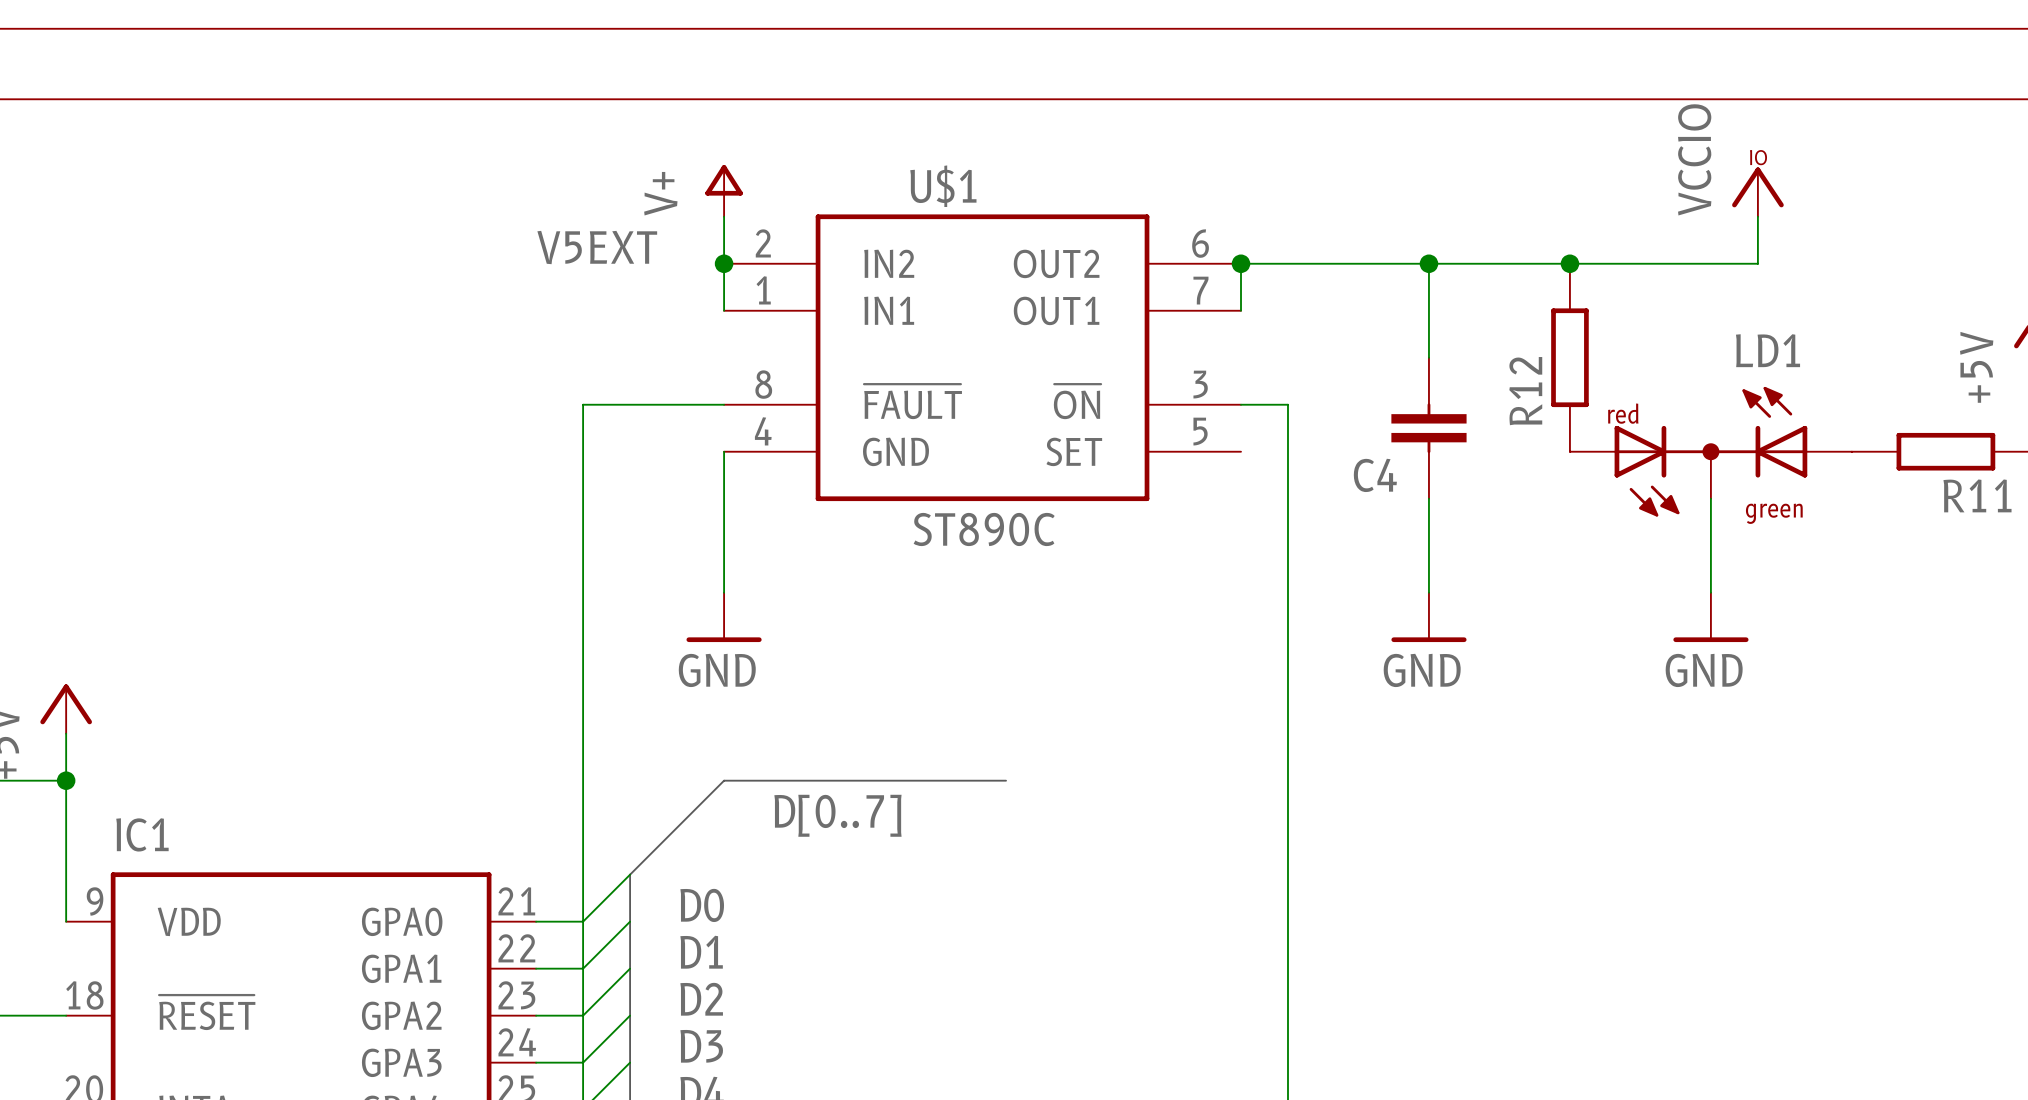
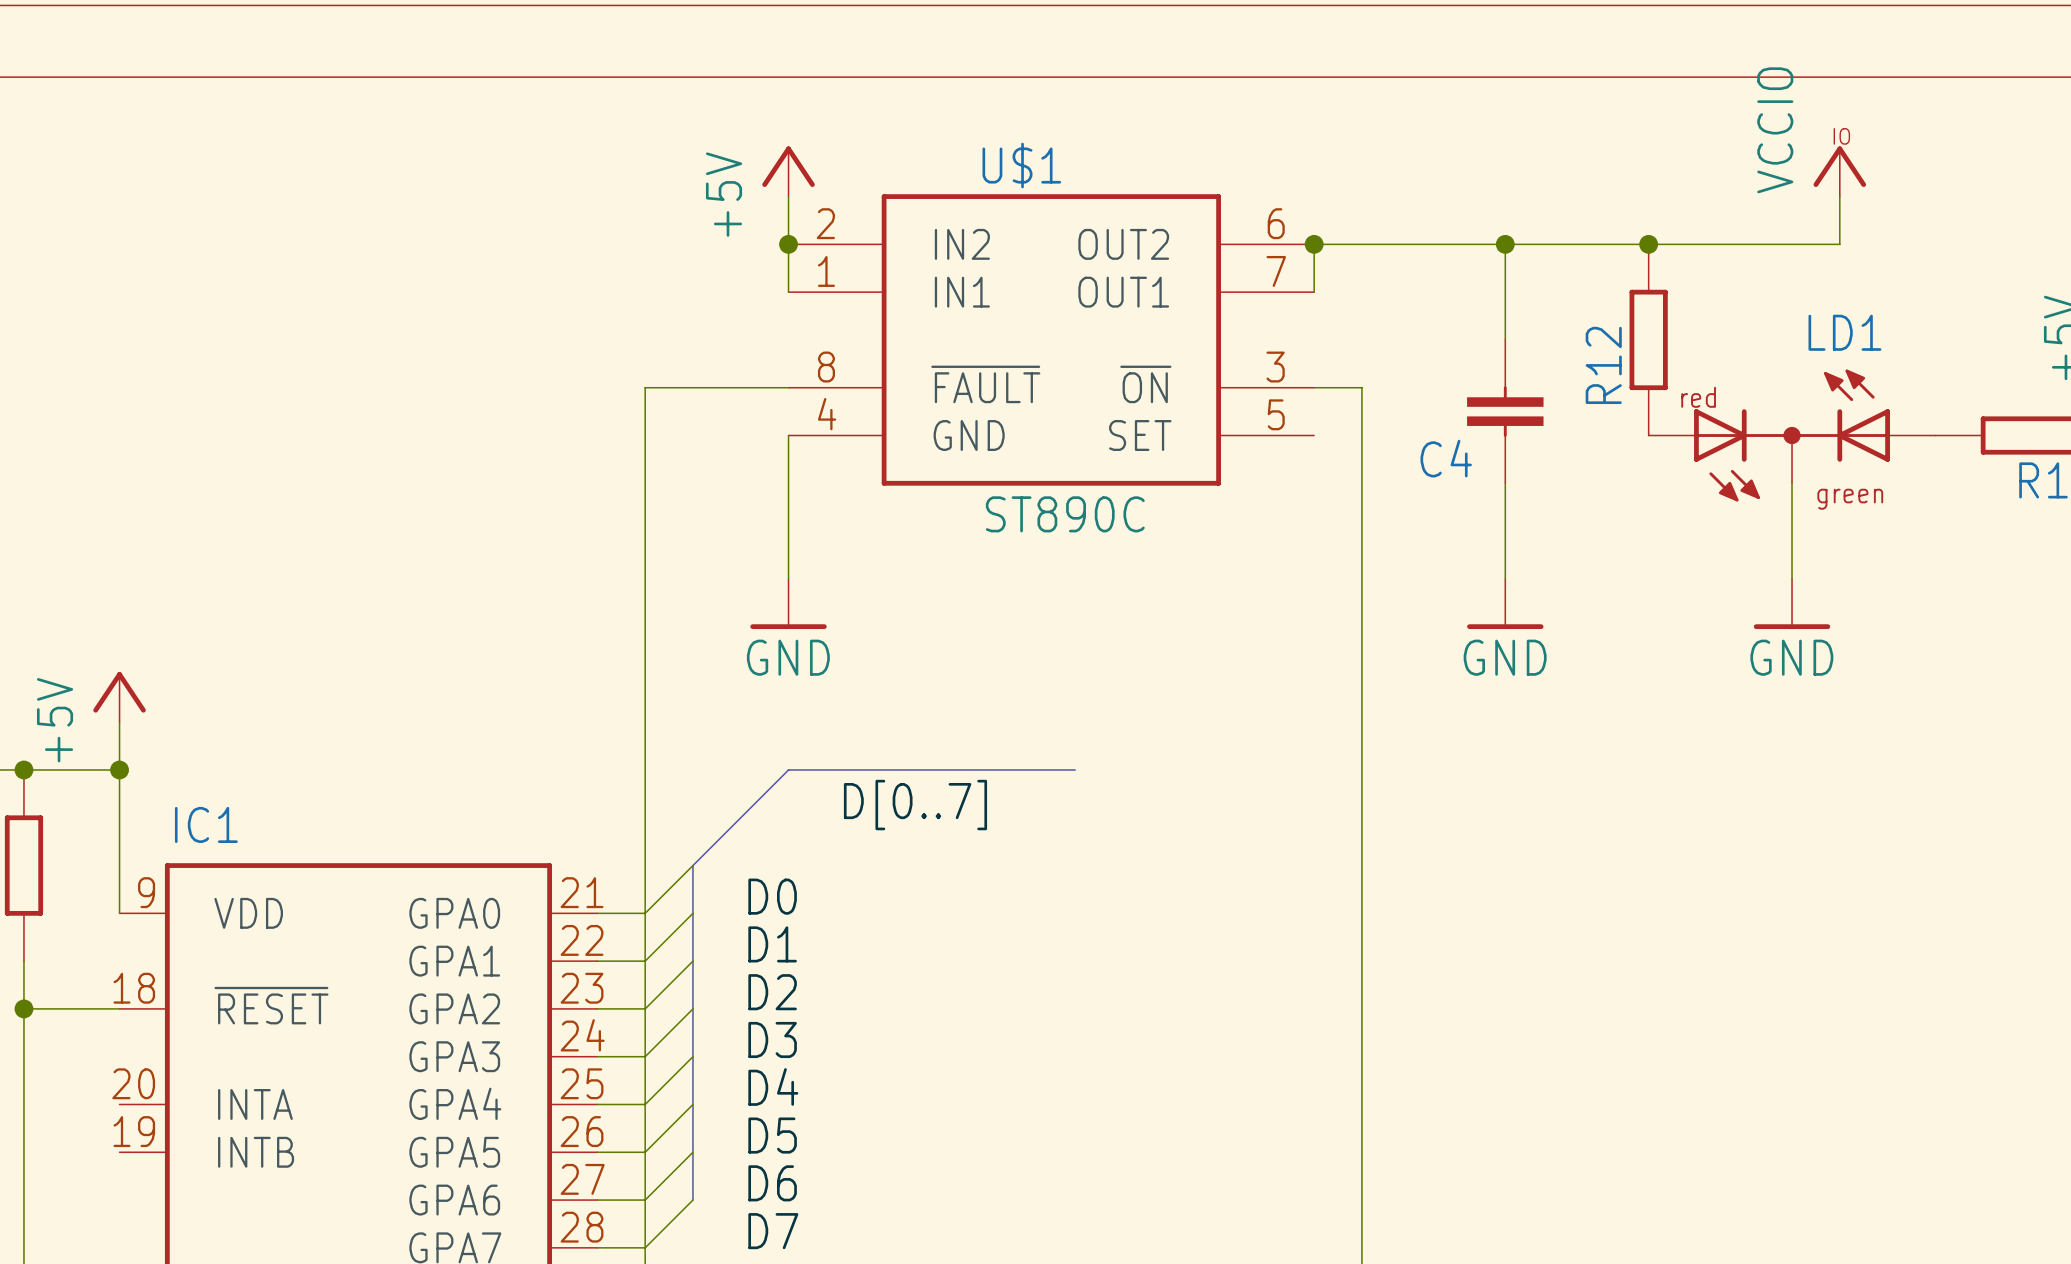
power symbol: V+ (724, 190) -> +5V (788, 171)
label: V5EXT (597, 247) -> none

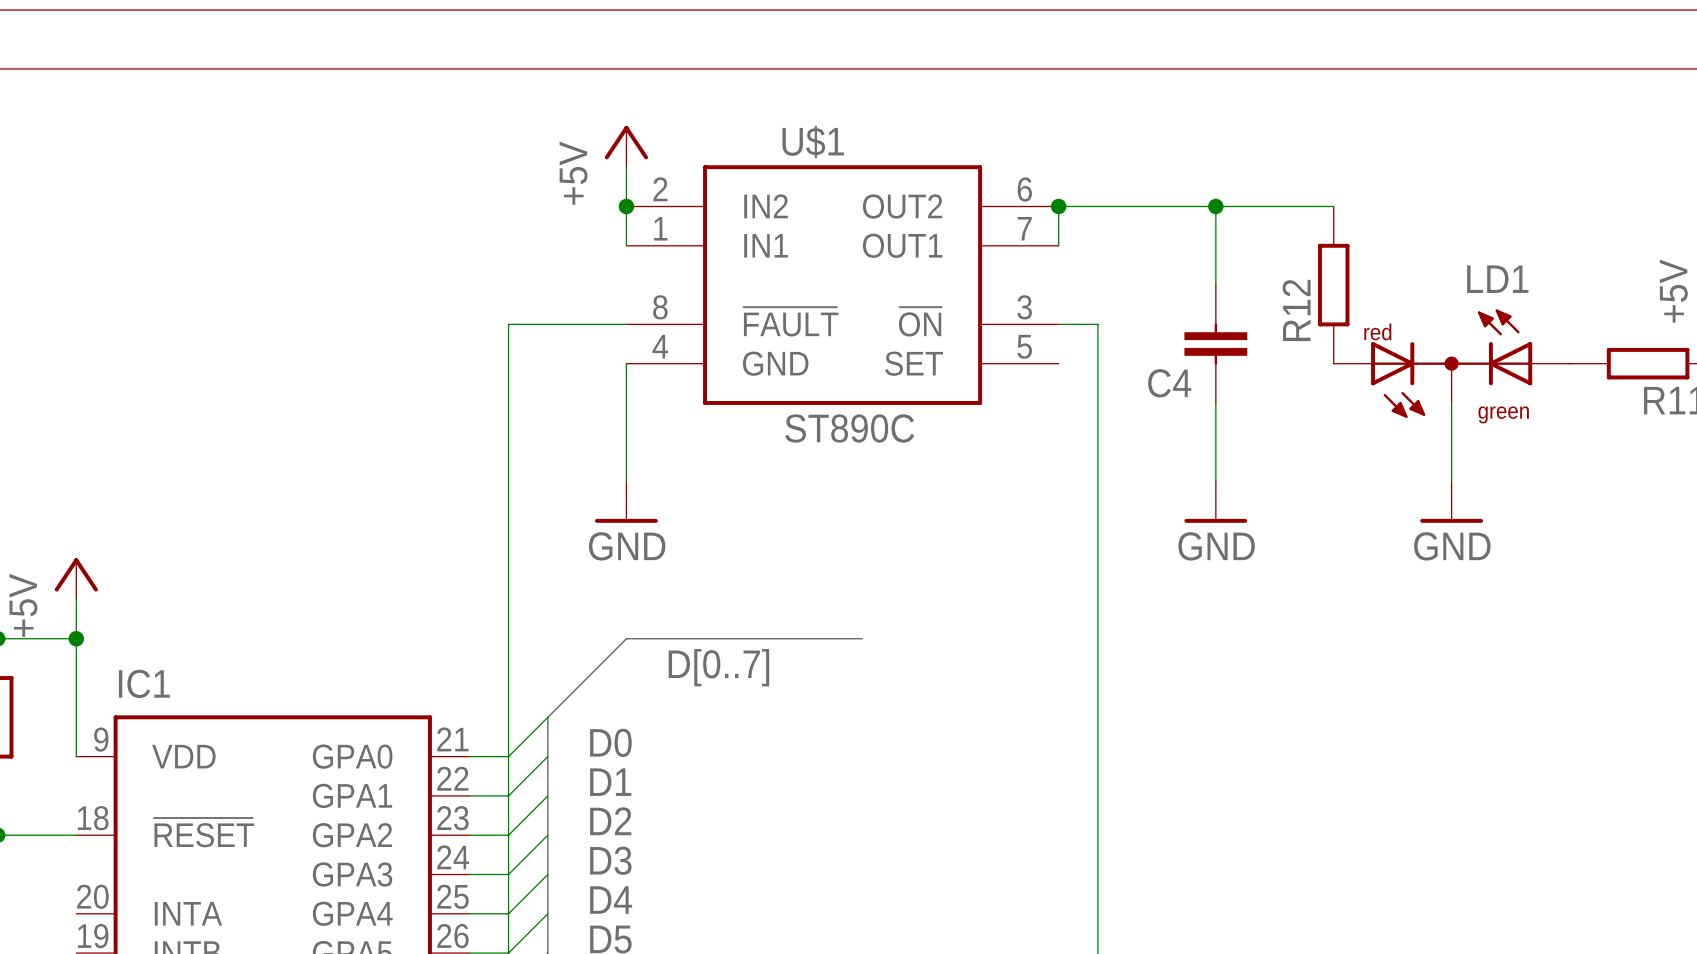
power symbol: VCCIO (1839, 171) -> none
wire: (1839, 196) (1839, 244) (1648, 244) -> none
junction: (1648, 244) -> none

